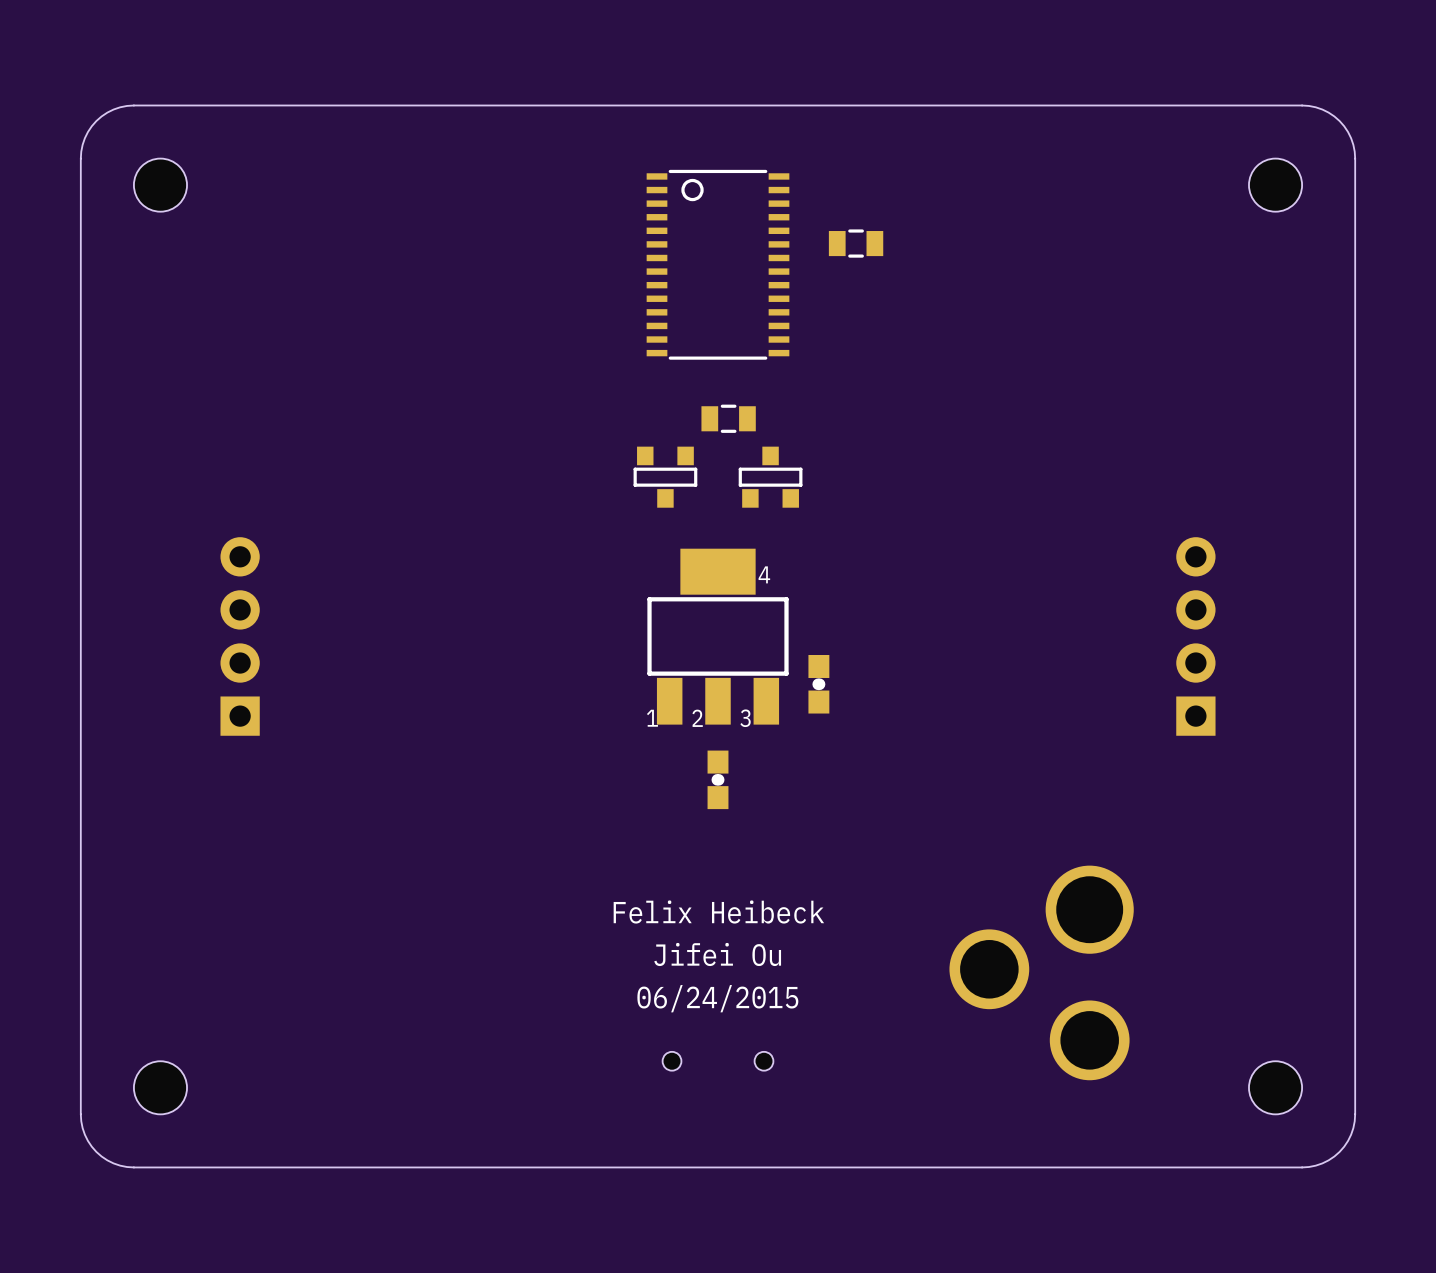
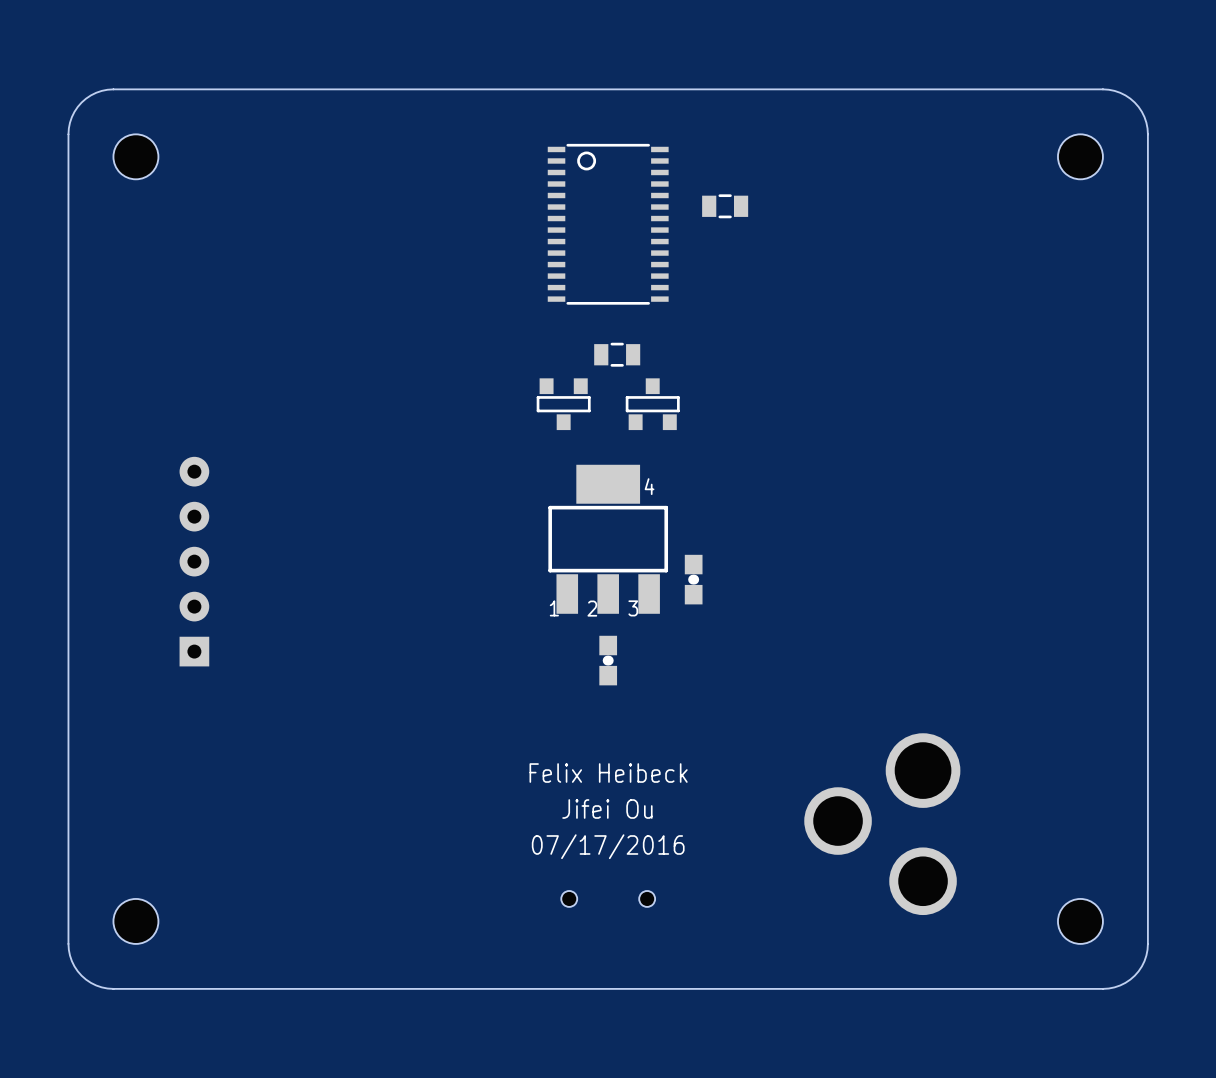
part: (240, 636) -> none
part: (1195, 636) -> none
part: none -> (194, 561)
text: 06/24/2015 (717, 998) -> 07/17/2016 (608, 846)

